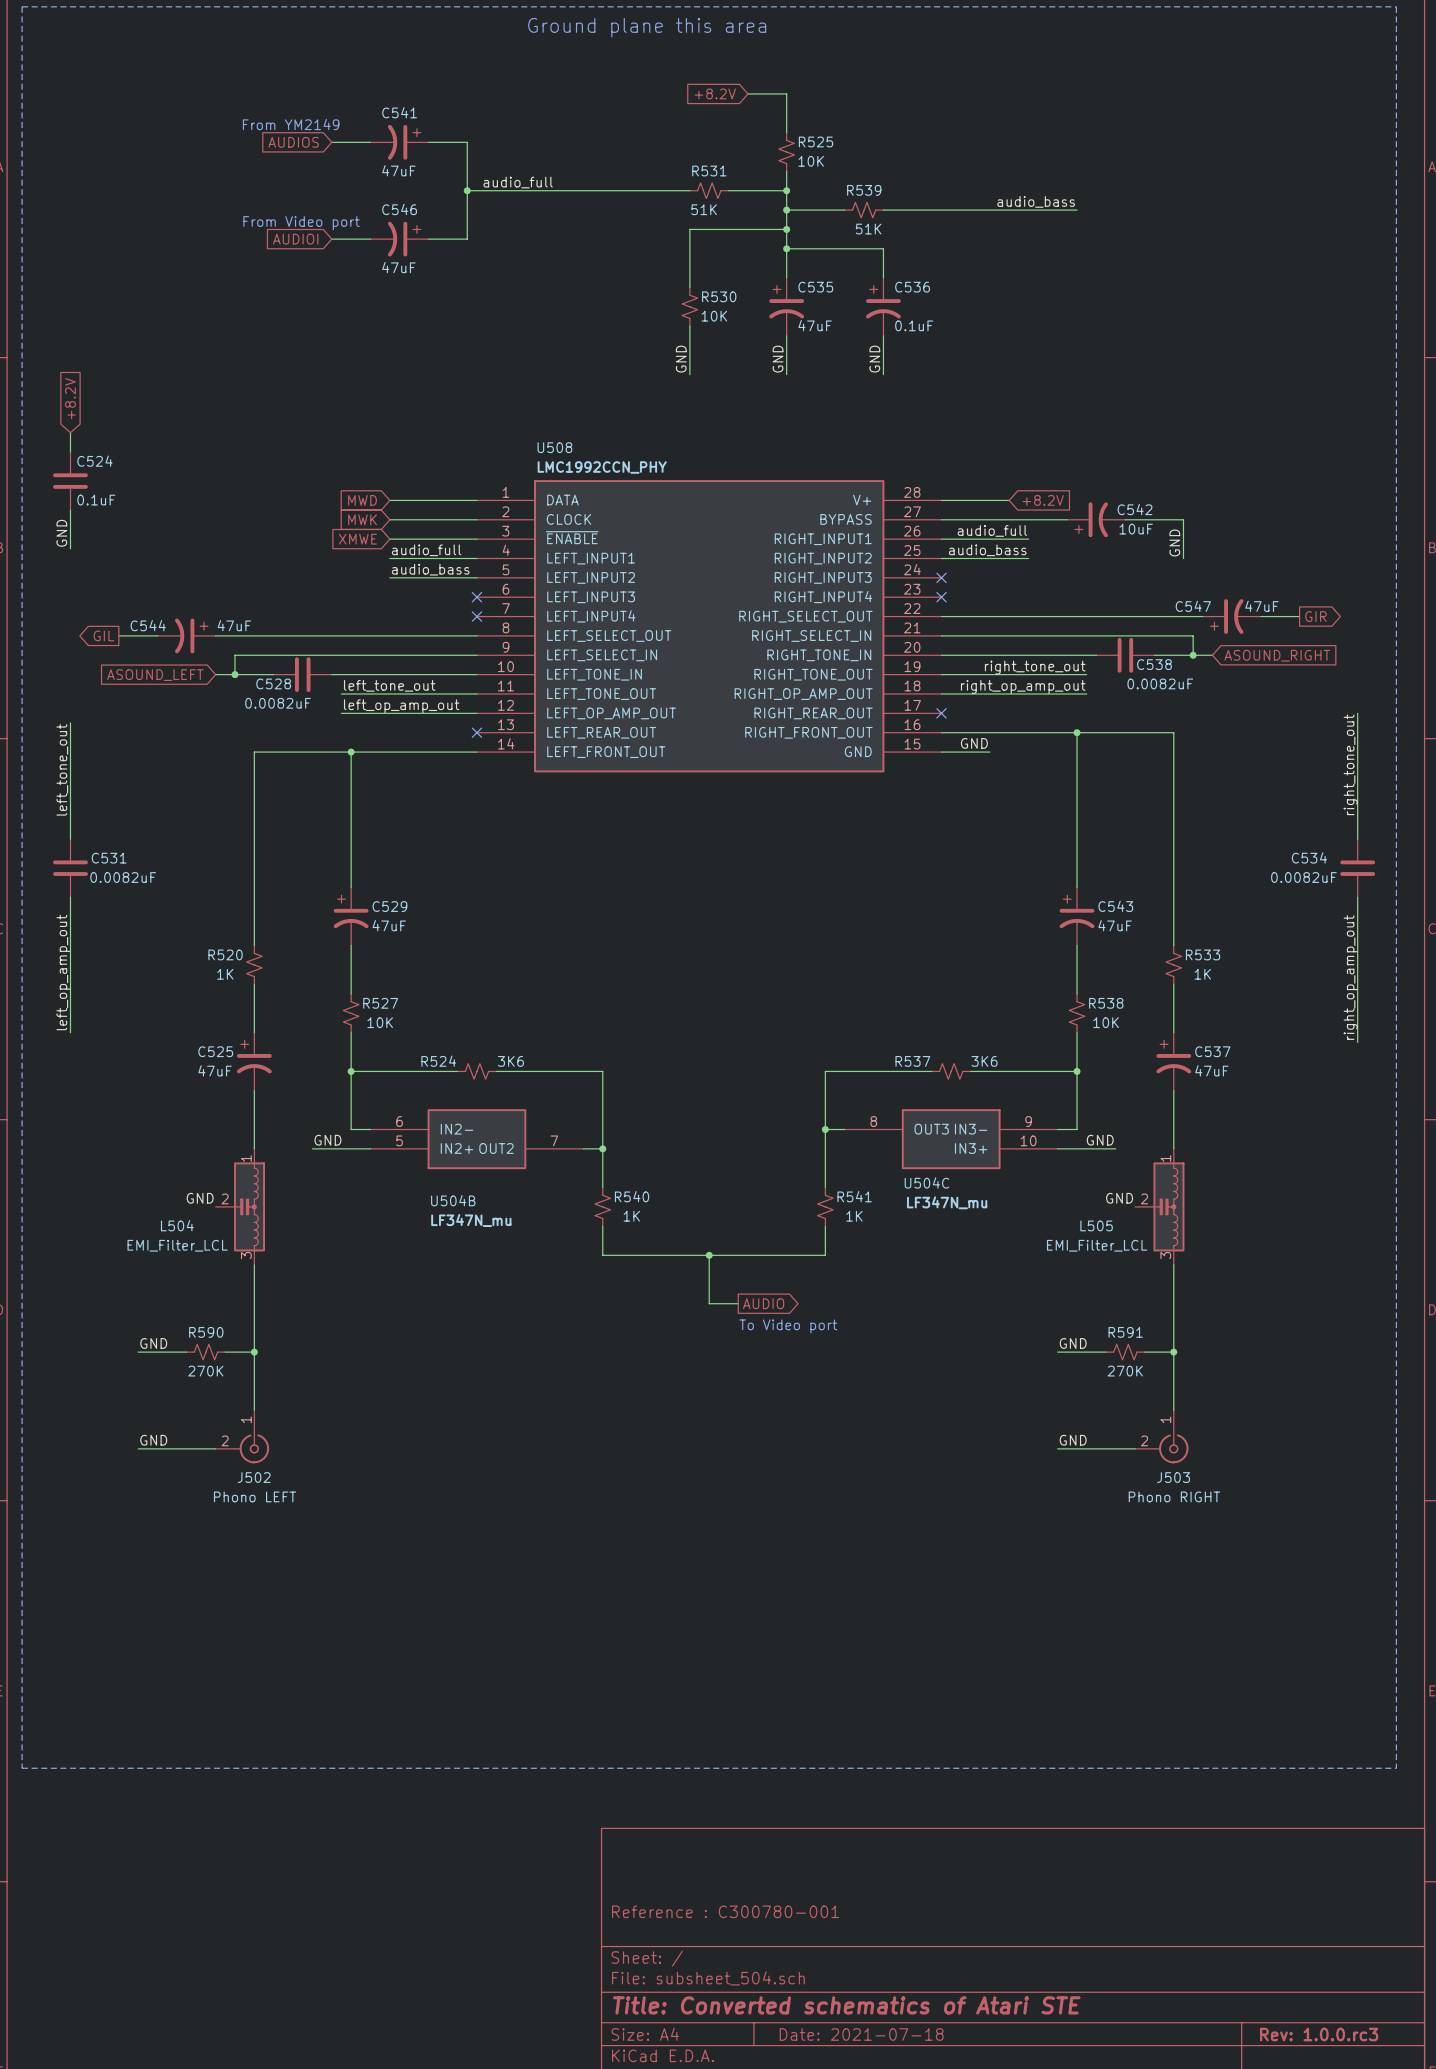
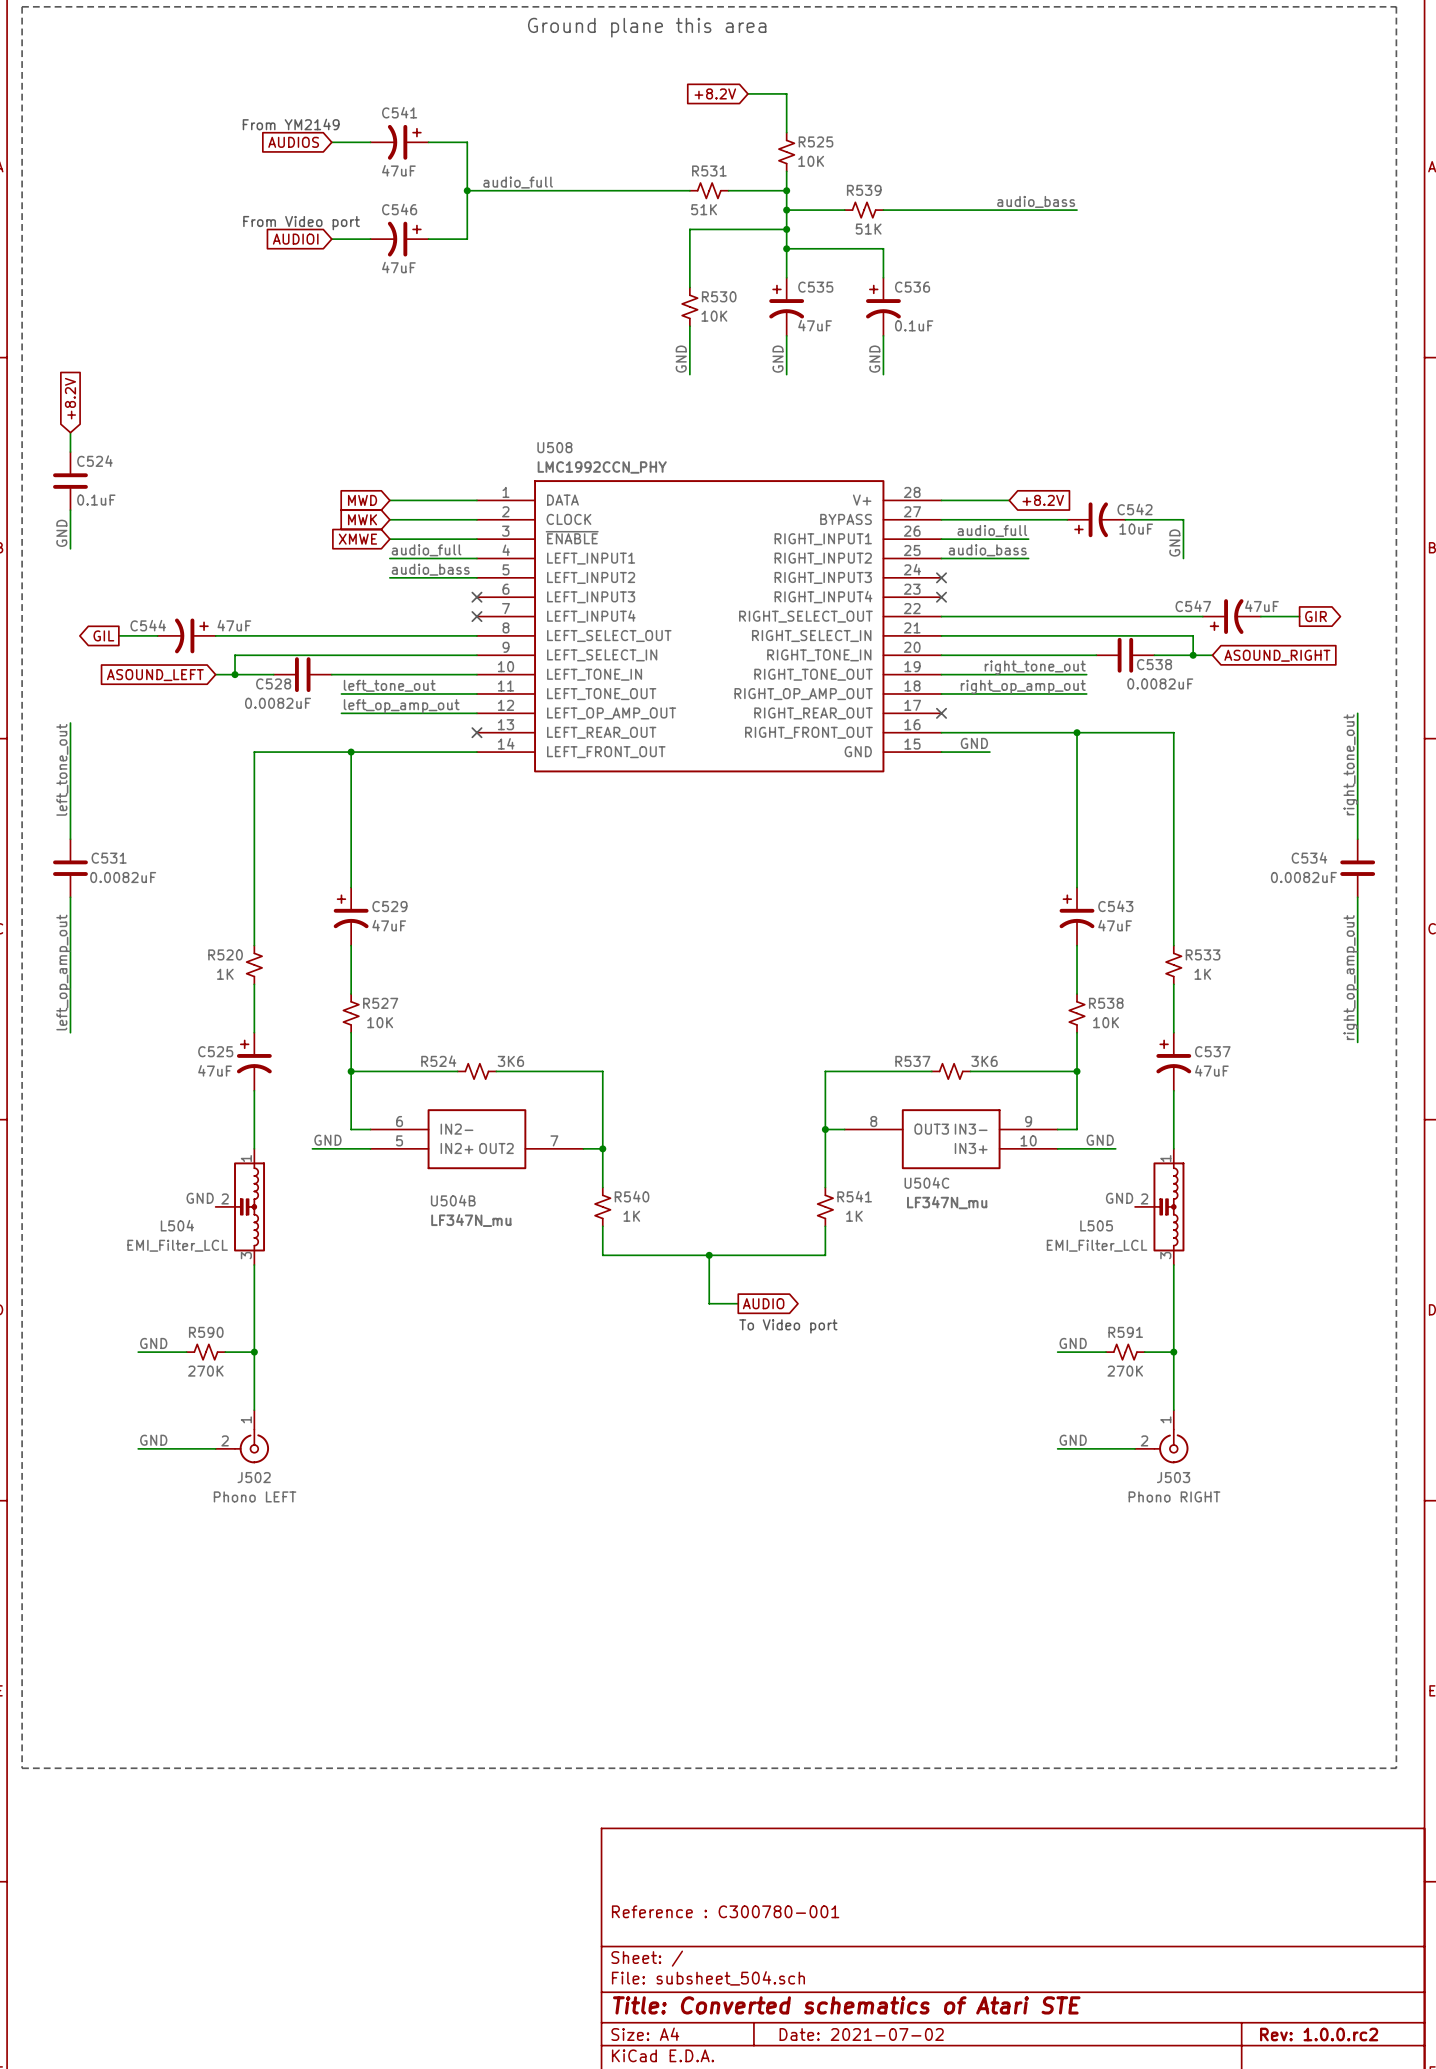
title block: Date: 2021-07-18 (861, 2034) -> Date: 2021-07-02 (861, 2034)
title block: Rev: 1.0.0.rc3 (1319, 2034) -> Rev: 1.0.0.rc2 (1319, 2034)

